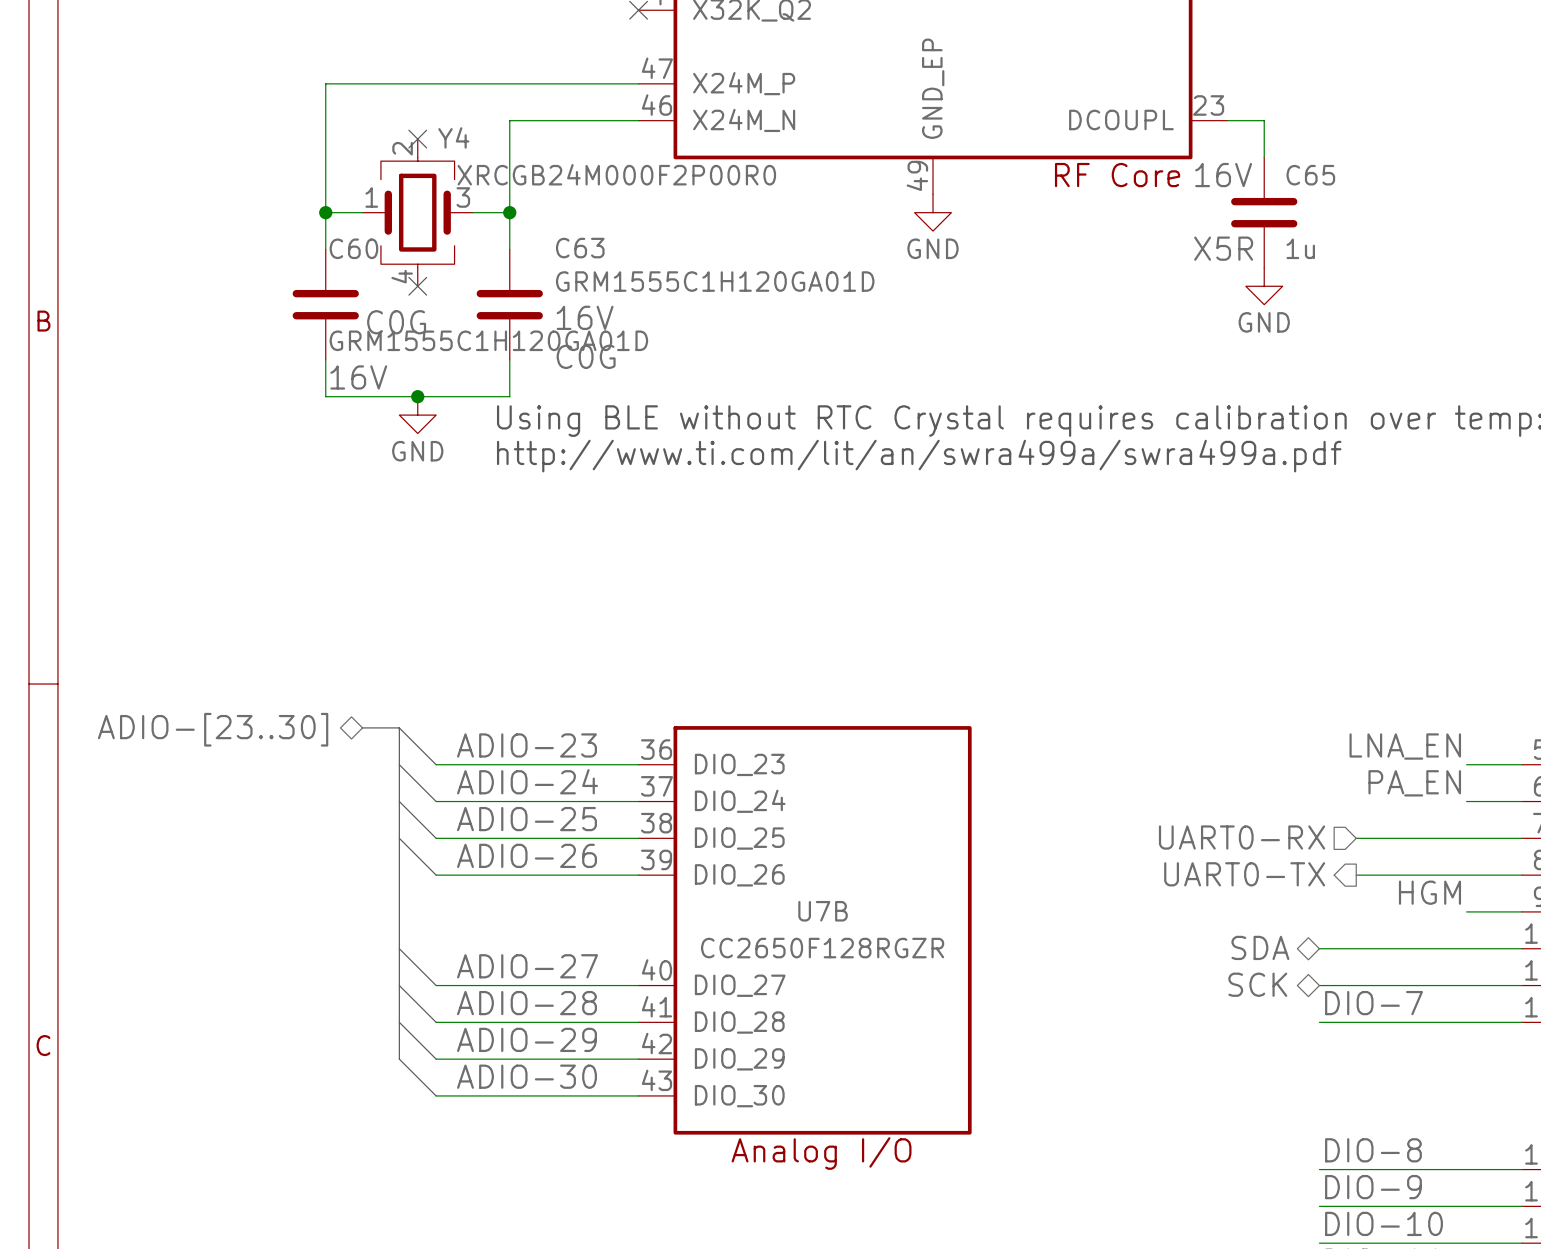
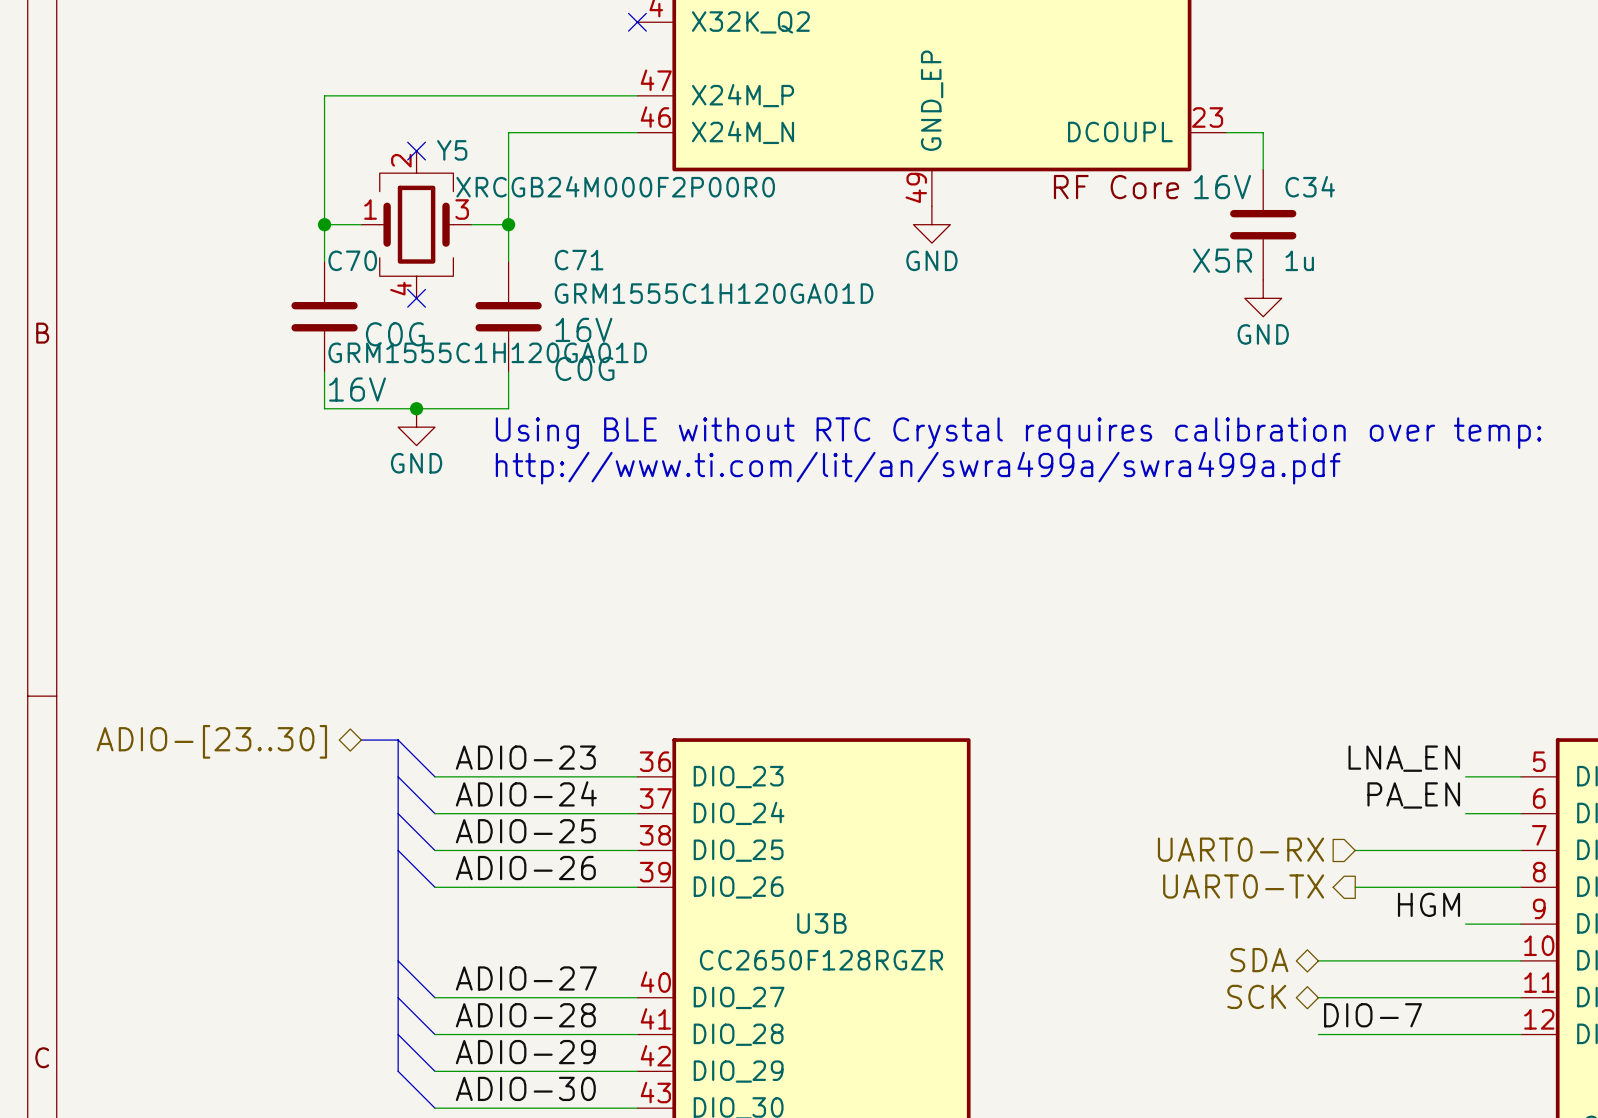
Y4 name: Y4 (453, 137) -> Y5 (452, 150)
C65 name: C65 (1310, 175) -> C34 (1310, 186)
C60 name: C60 (353, 248) -> C70 (352, 260)
C63 name: C63 (580, 248) -> C71 (579, 260)
U7B name: U7B (823, 911) -> U3B (821, 923)

